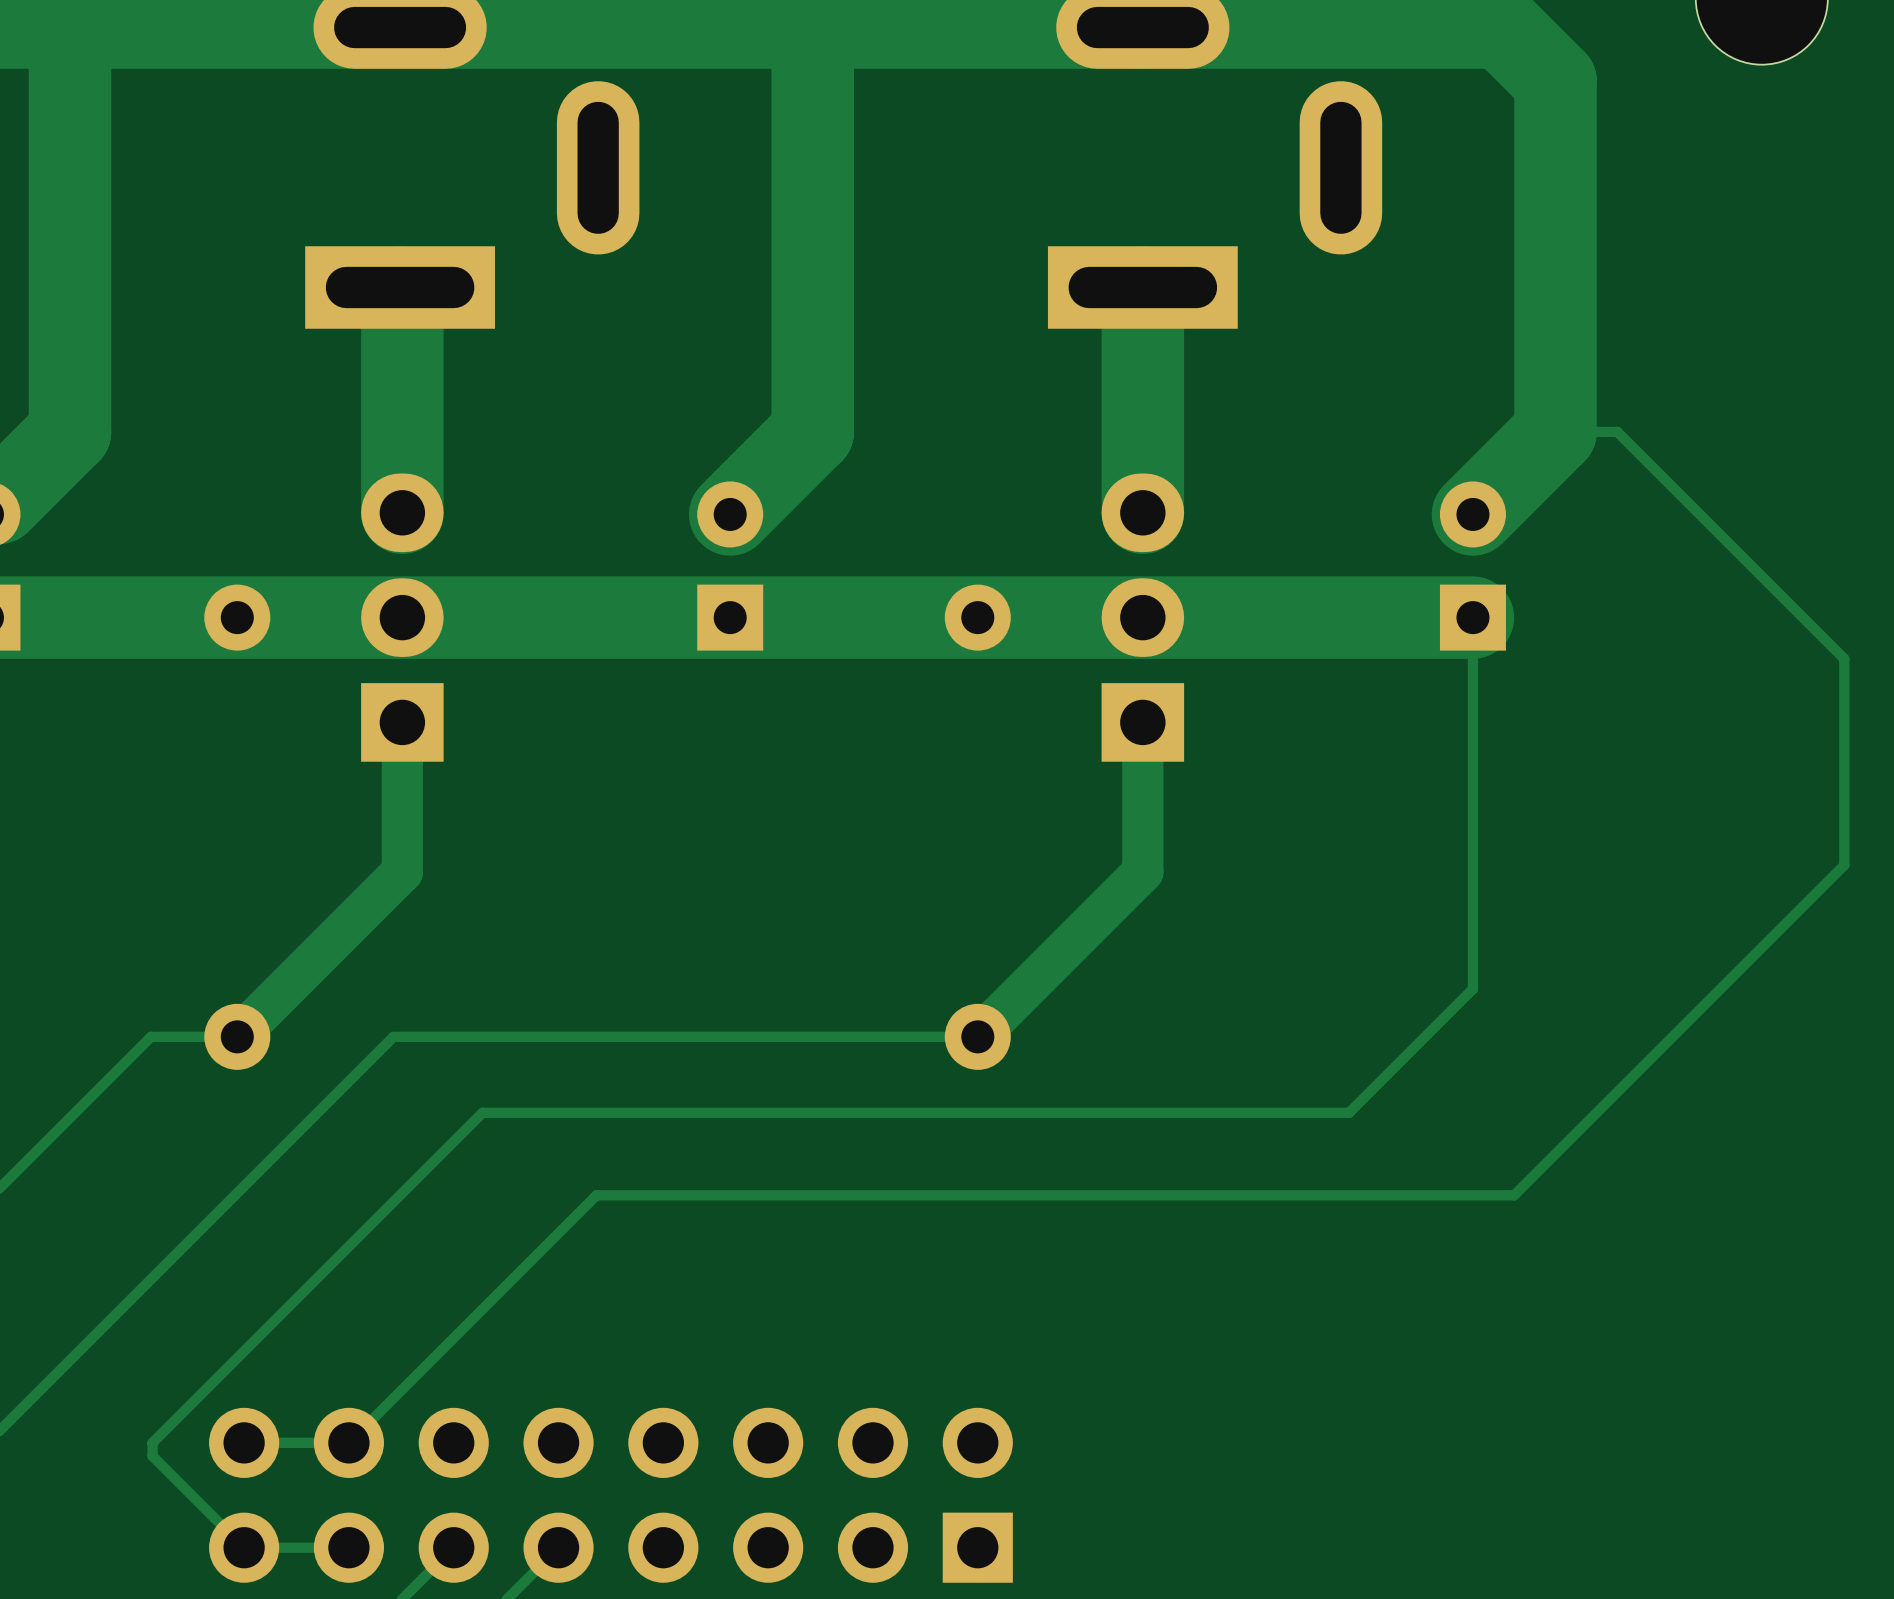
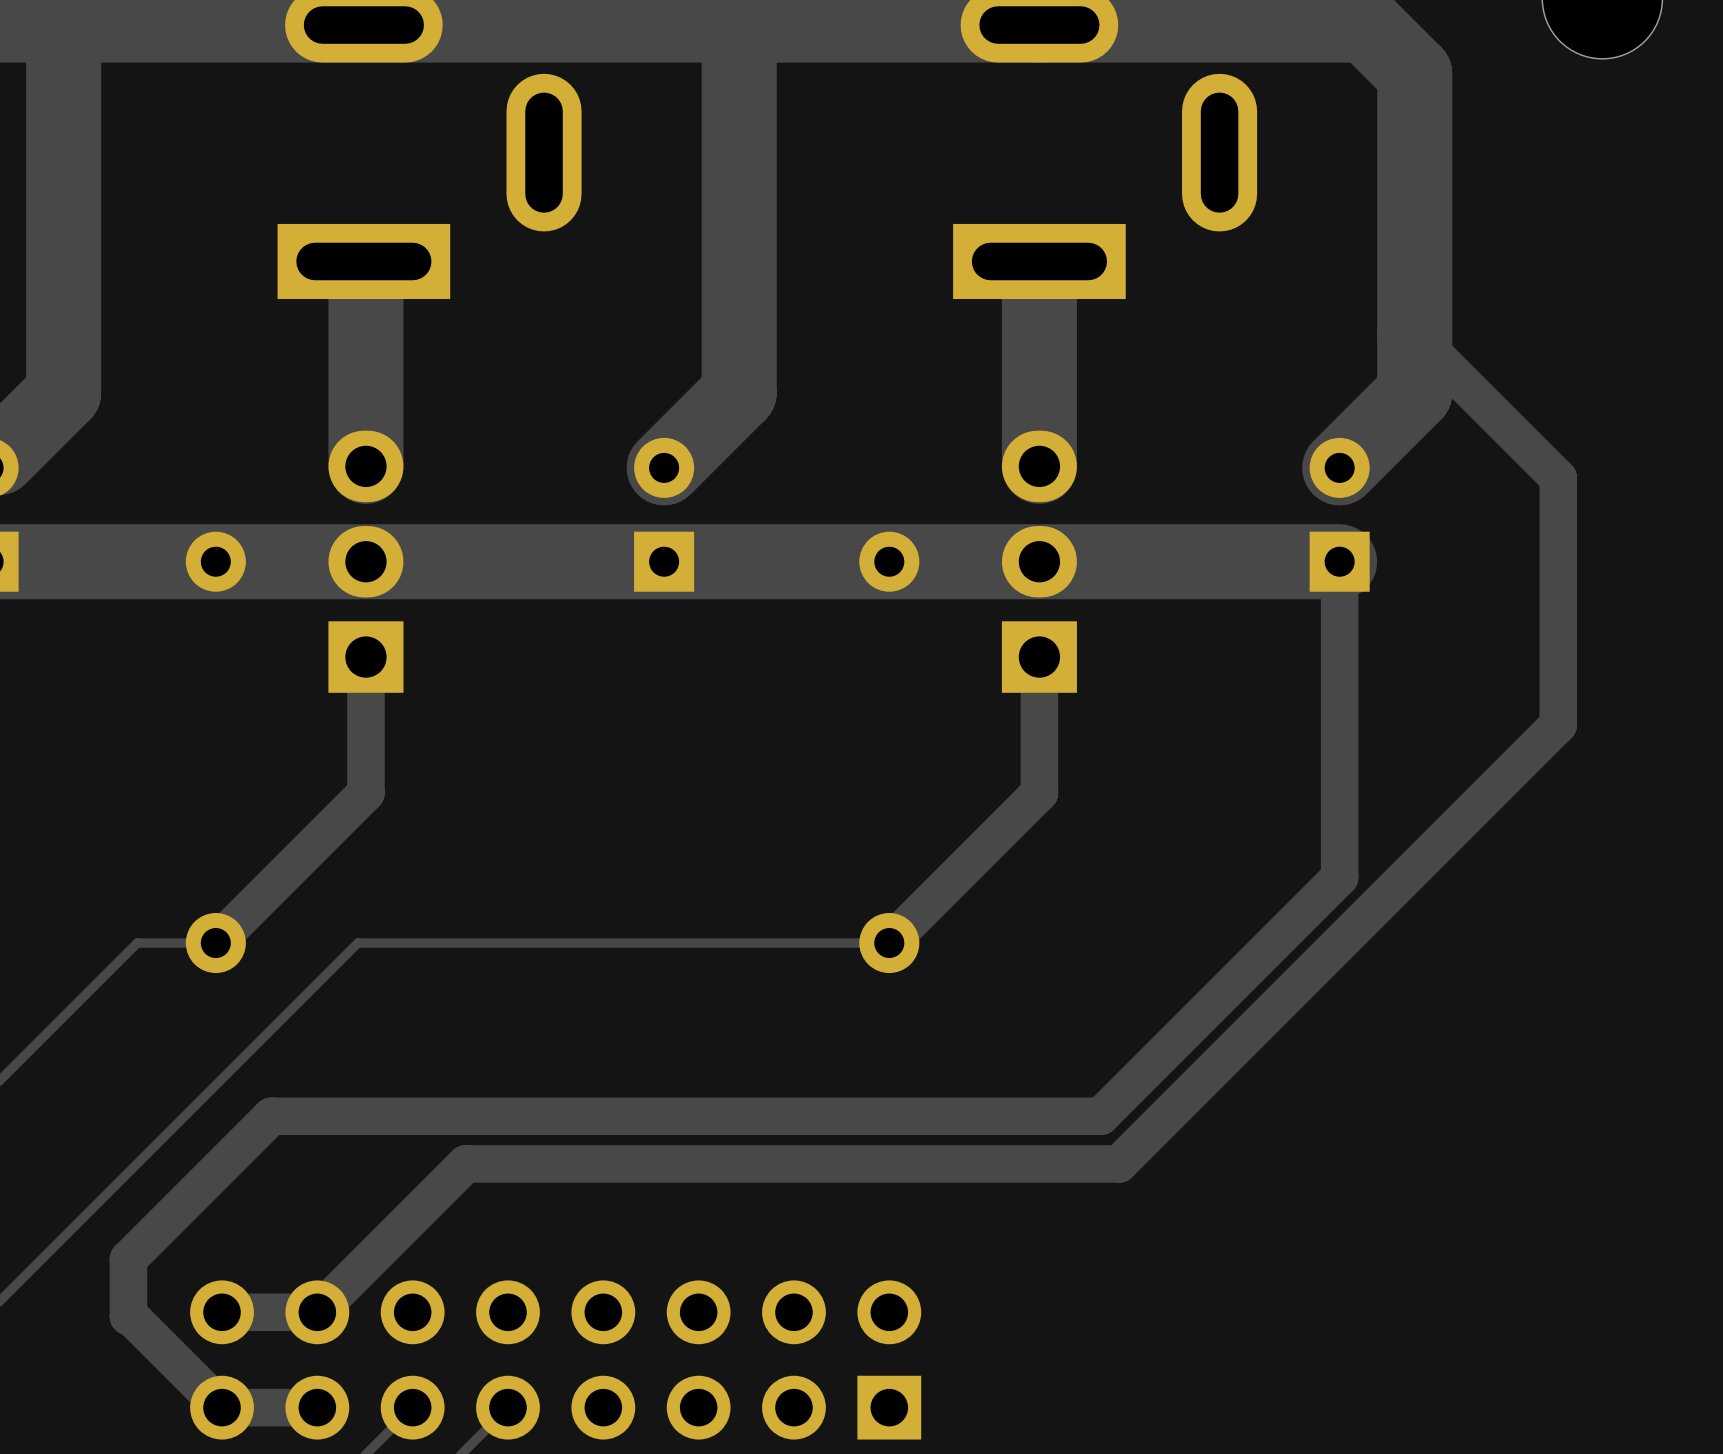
track: (1555, 431) (1617, 431) (1844, 658) (1844, 865) (1514, 1195) (596, 1195) (512, 1279) -> (1414, 334) (1558, 478) (1558, 724) (1119, 1163) (465, 1163)
track width: thin (1472, 617) (1472, 964) -> thick (1339, 561) (1339, 877)
track: (1472, 964) (1472, 988) (1349, 1112) (482, 1112) (152, 1442) (152, 1456) -> (1339, 877) (1100, 1116) (271, 1116) (128, 1259) (128, 1316) (138, 1324)
track width: thin (512, 1279) (348, 1442) (244, 1442) -> thick (465, 1163) (317, 1312) (222, 1312)
track width: thin (152, 1456) (244, 1547) (348, 1547) -> thick (138, 1324) (222, 1407) (317, 1407)

